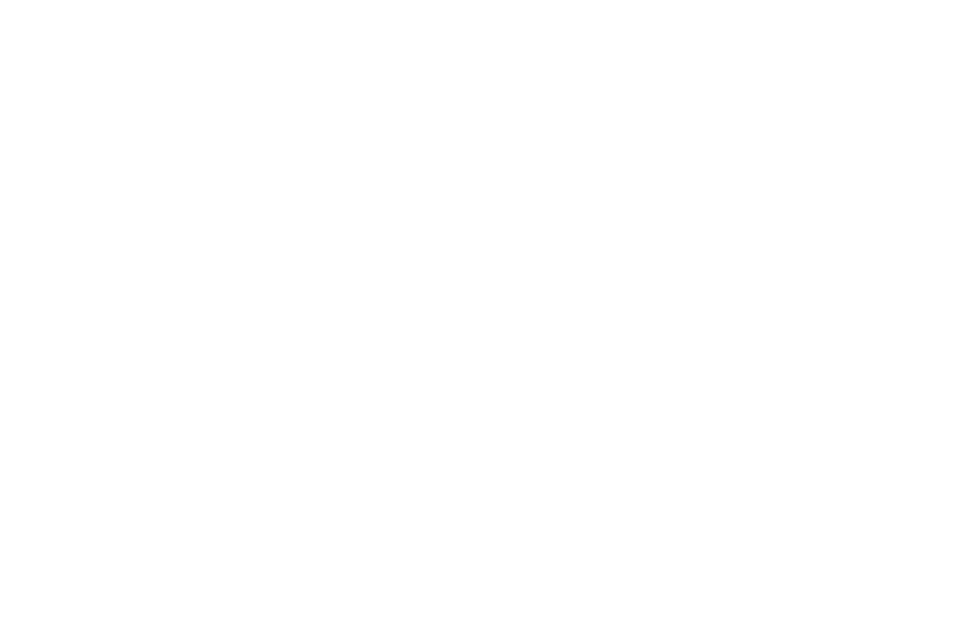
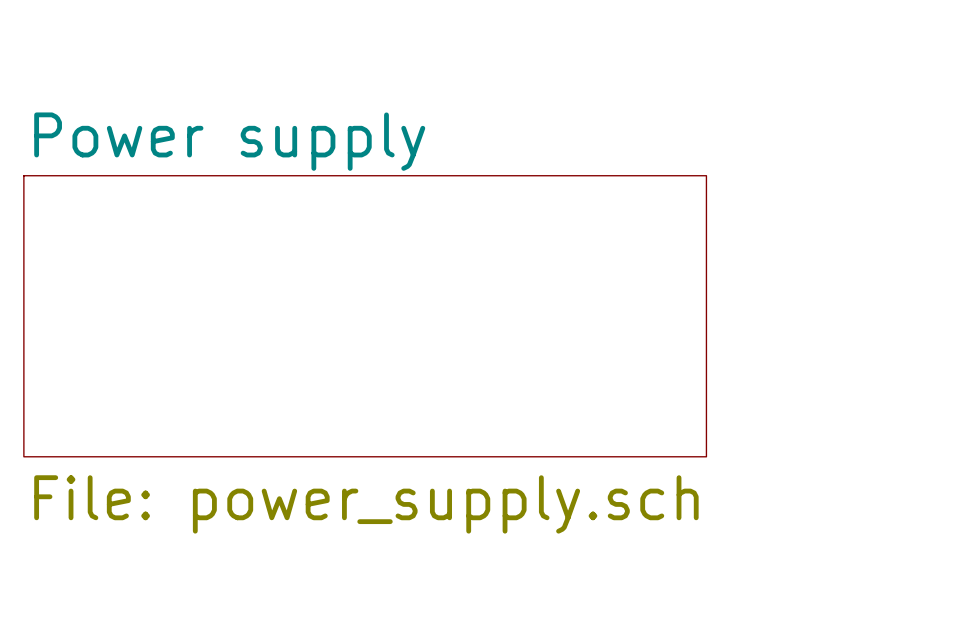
sheet Power supply: none -> File: power_supply.sch (365, 316)

